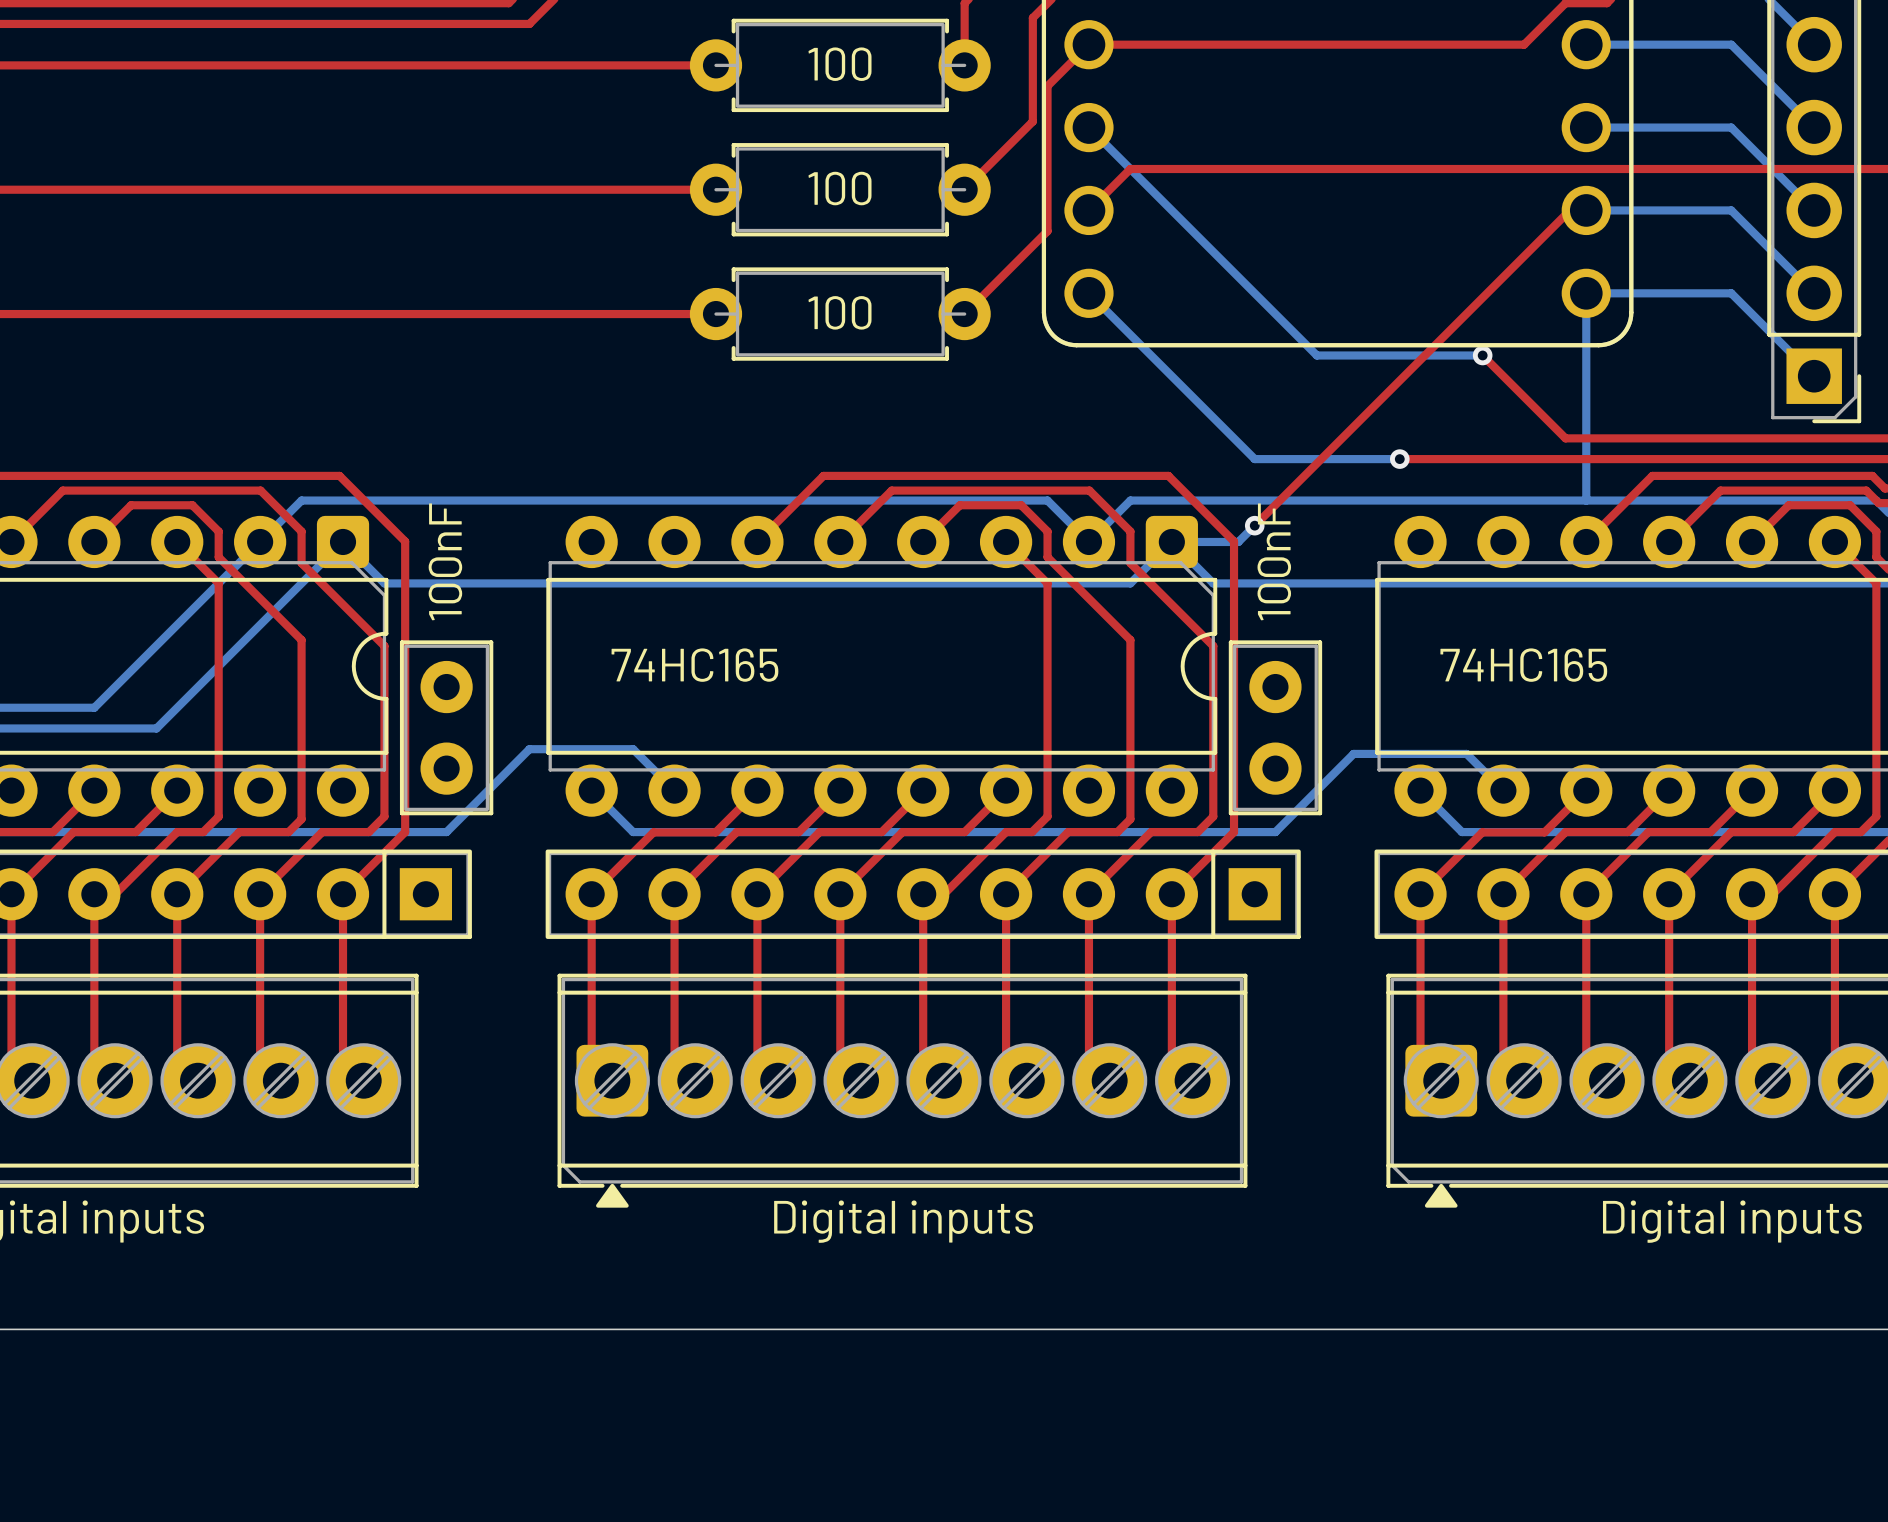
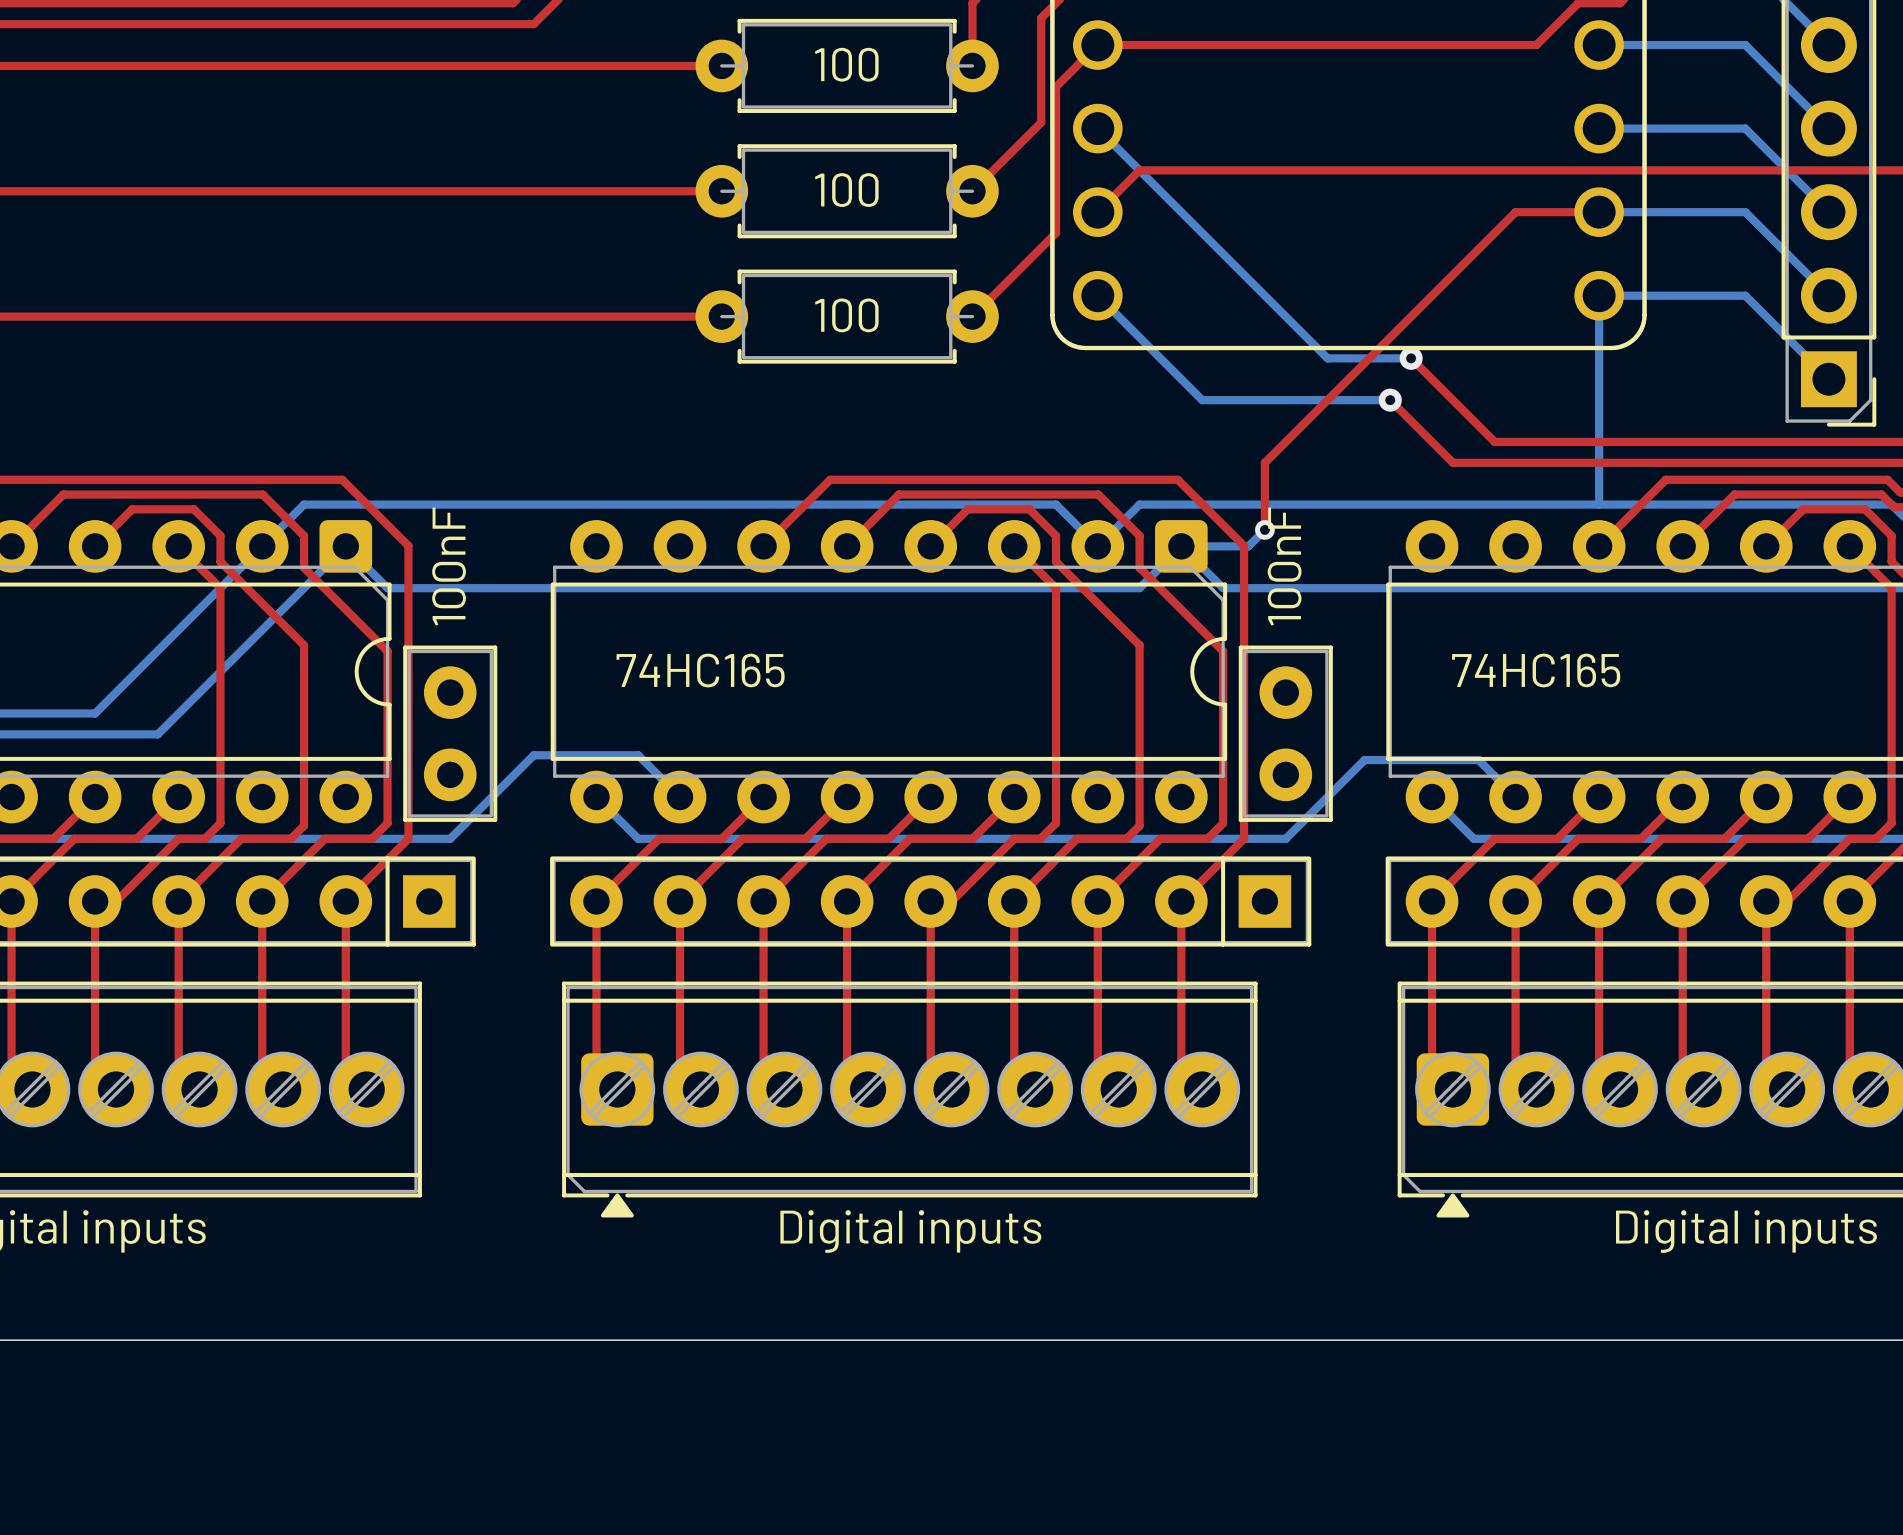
top track: (1569, 210) (1254, 525) -> (1582, 212) (1515, 212) (1264, 462) (1264, 529)
bottom track: (1399, 355) (1482, 355) -> none
via: none -> (1411, 358)
top track: (1482, 355) (1565, 438) -> (1411, 358) (1494, 441) (1578, 441)
via: (1482, 355) -> none
bottom track: (1192, 396) (1254, 459) (1399, 459) -> (1202, 400) (1390, 400)
via: none -> (1390, 400)
top track: (1399, 459) (1441, 459) -> (1390, 400) (1452, 462)
via: (1399, 459) -> none

